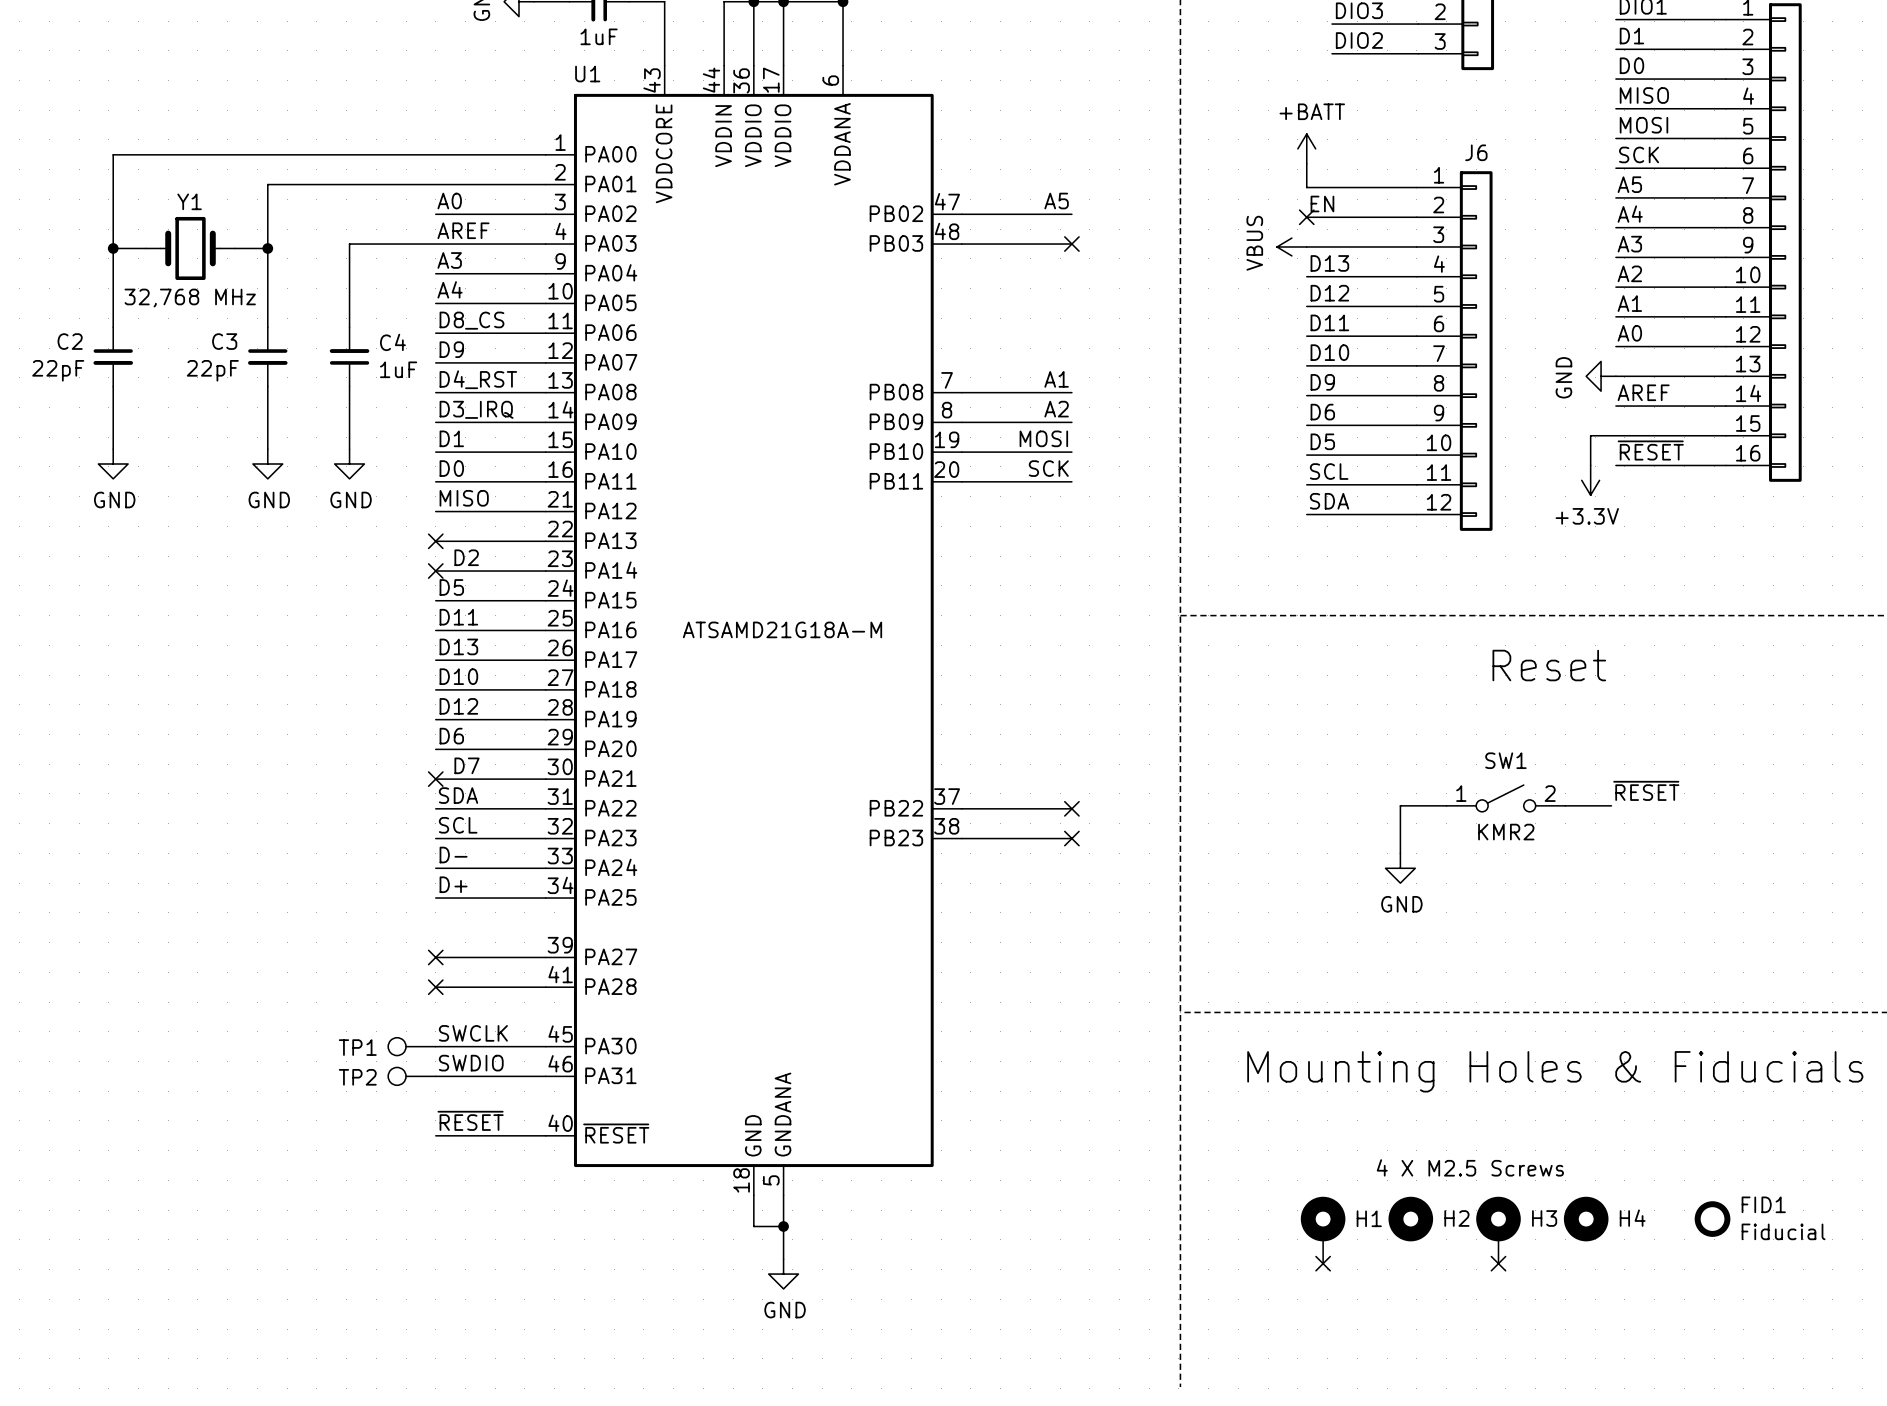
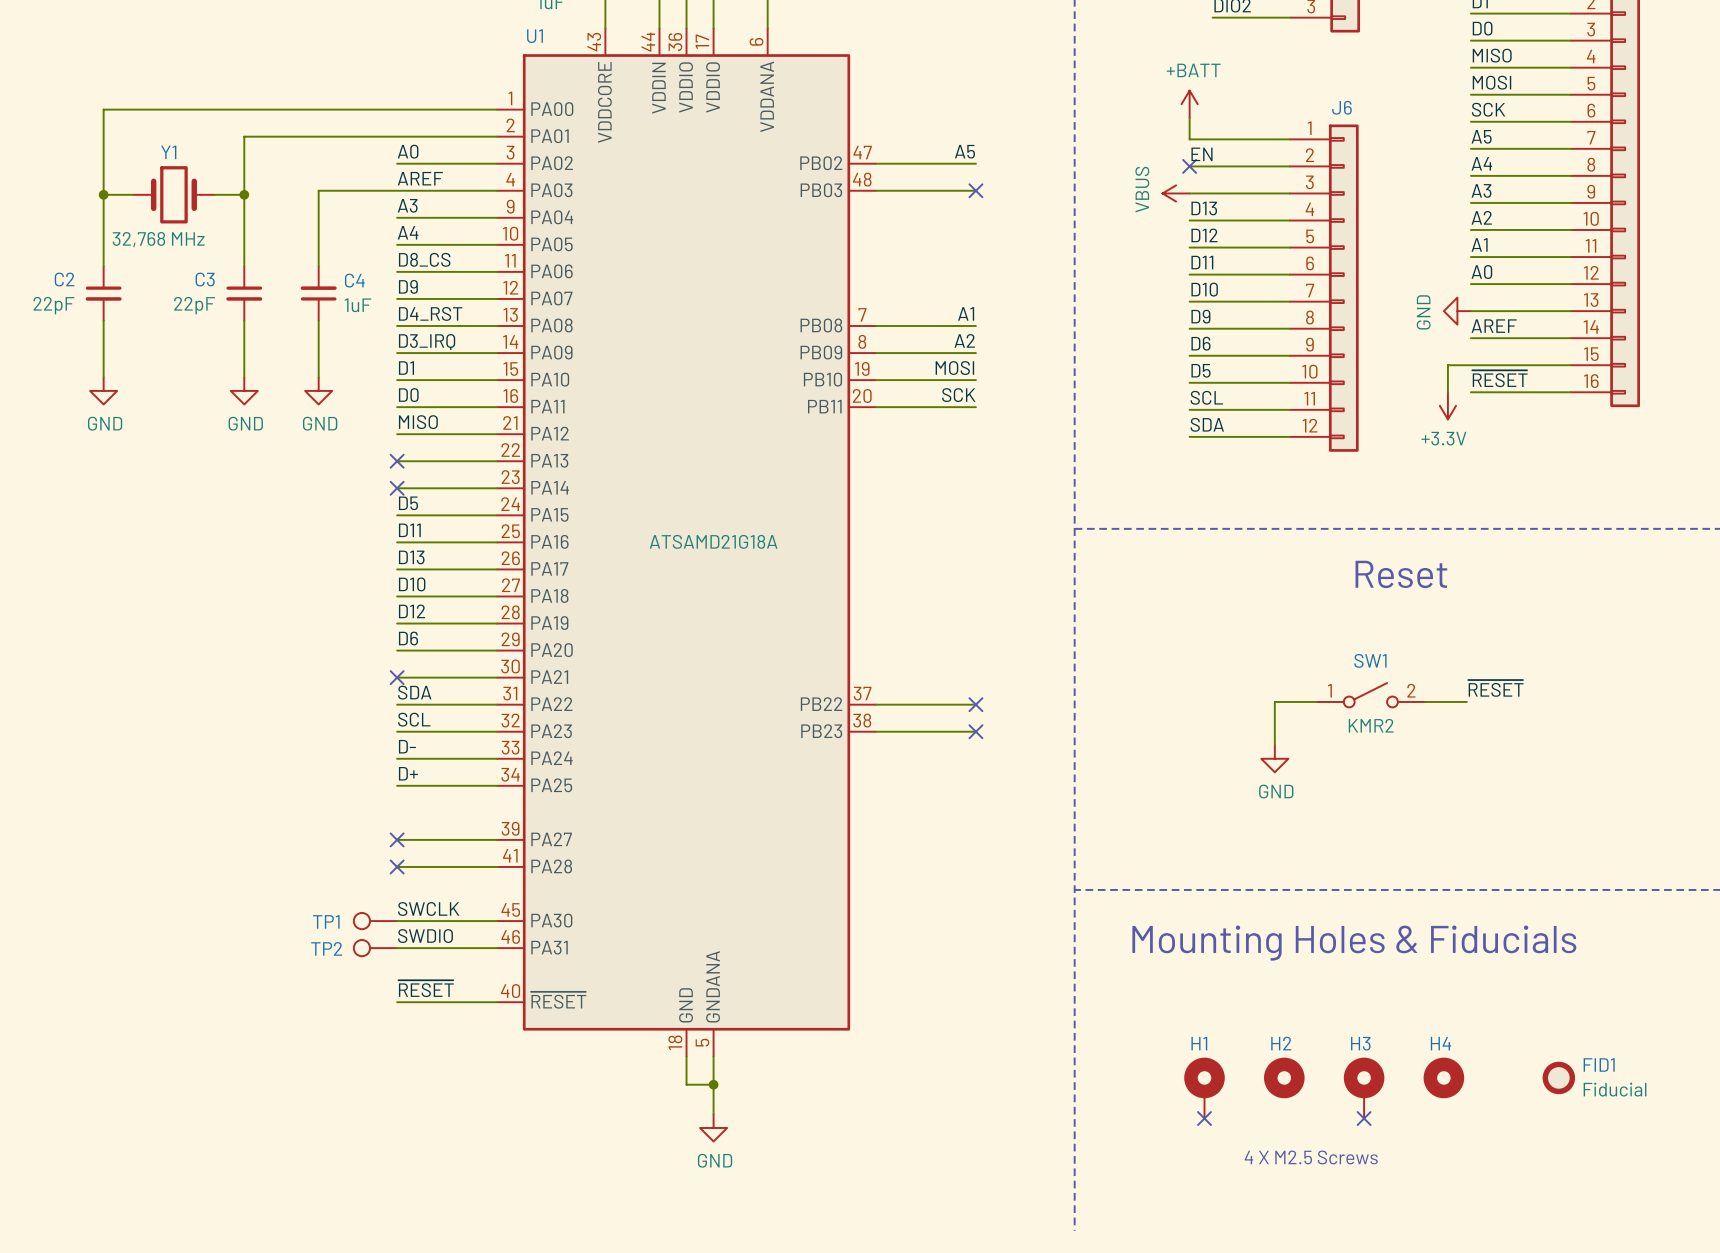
label: D2 (466, 557) -> none
U1 value: ATSAMD21G18A-M (782, 629) -> ATSAMD21G18A (713, 541)
label: D7 (467, 765) -> none
text position: 4 X M2.5 Screws (1470, 1167) -> 4 X M2.5 Screws (1311, 1157)
H1 name position: H1 (1369, 1218) -> H1 (1199, 1043)
H2 name position: H2 (1456, 1218) -> H2 (1281, 1043)
H3 name position: H3 (1544, 1218) -> H3 (1360, 1043)
H4 name position: H4 (1632, 1218) -> H4 (1440, 1043)

